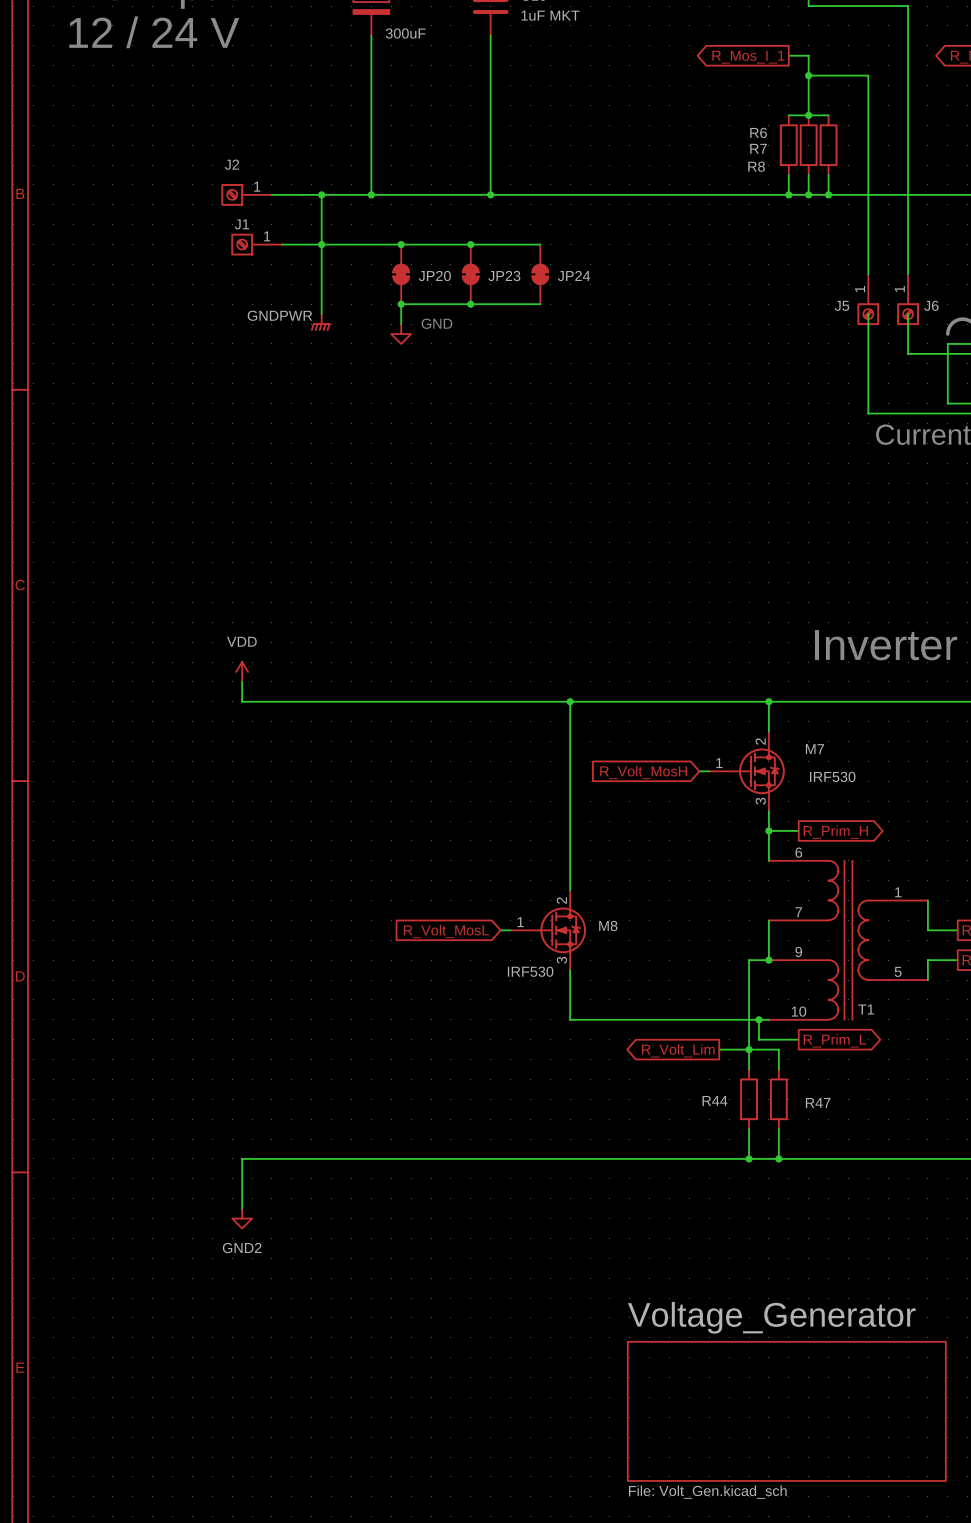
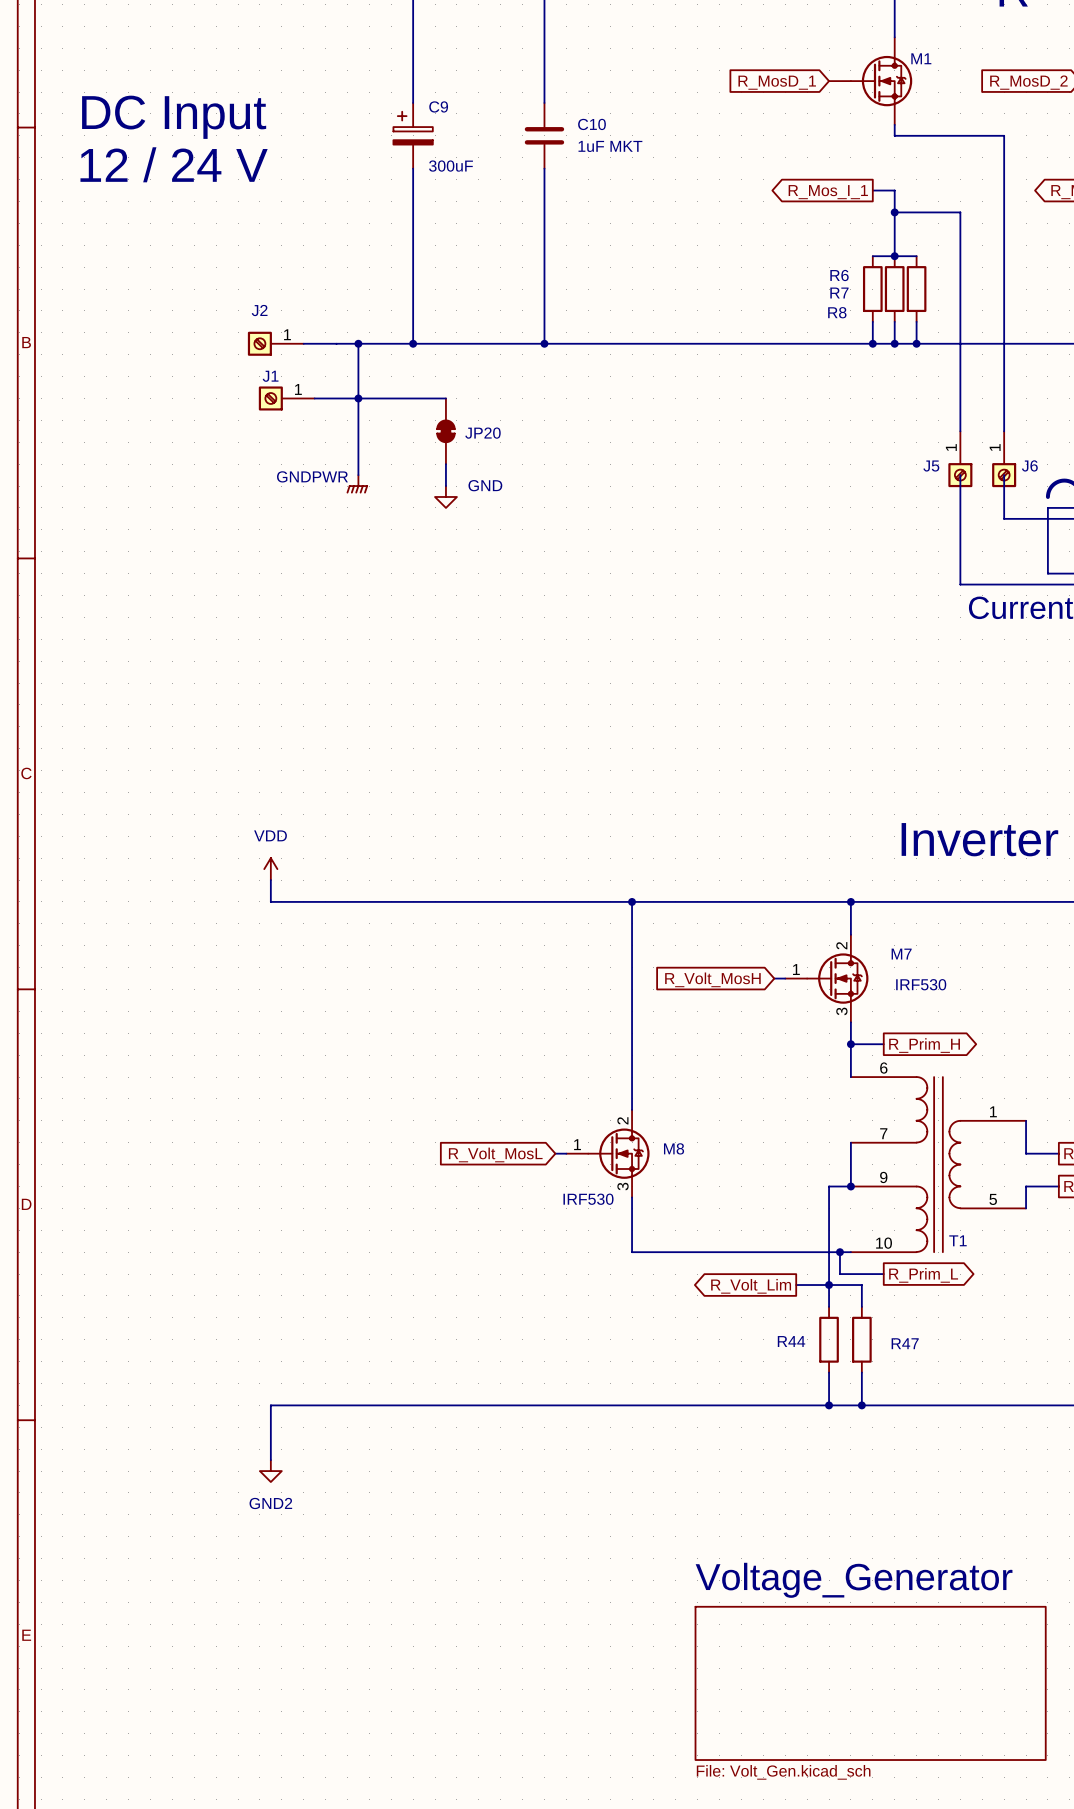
wire: (401, 244) (540, 244) -> none
junction: (401, 244) -> none
junction: (470, 244) -> none
JP23: (470, 274) -> none
JP24: (540, 274) -> none
wire: (401, 304) (540, 304) -> none
junction: (401, 304) -> none
junction: (470, 304) -> none

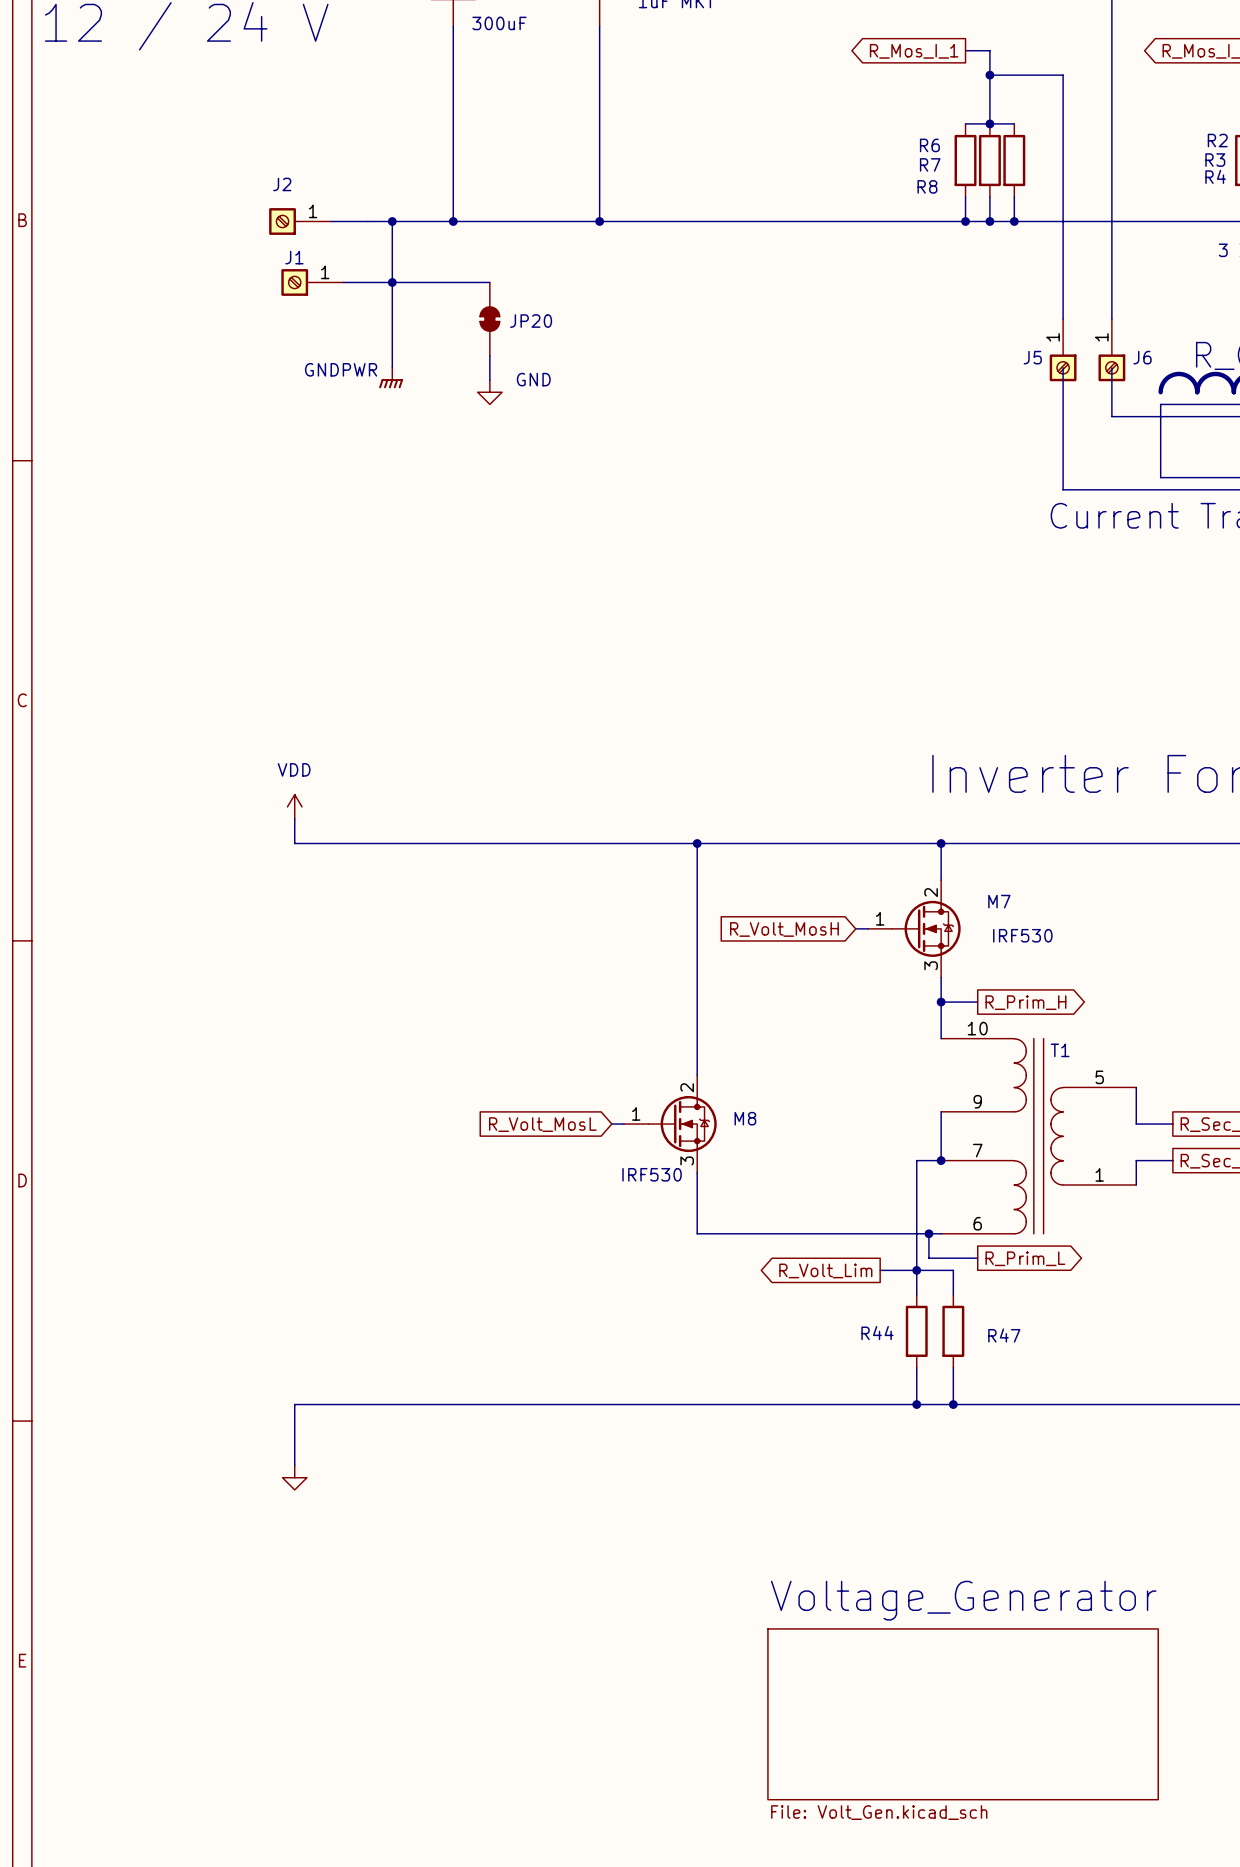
T1 flip: as is (938, 1164) -> up-down (1038, 1136)
power symbol text: GND2 (270, 1503) -> none

